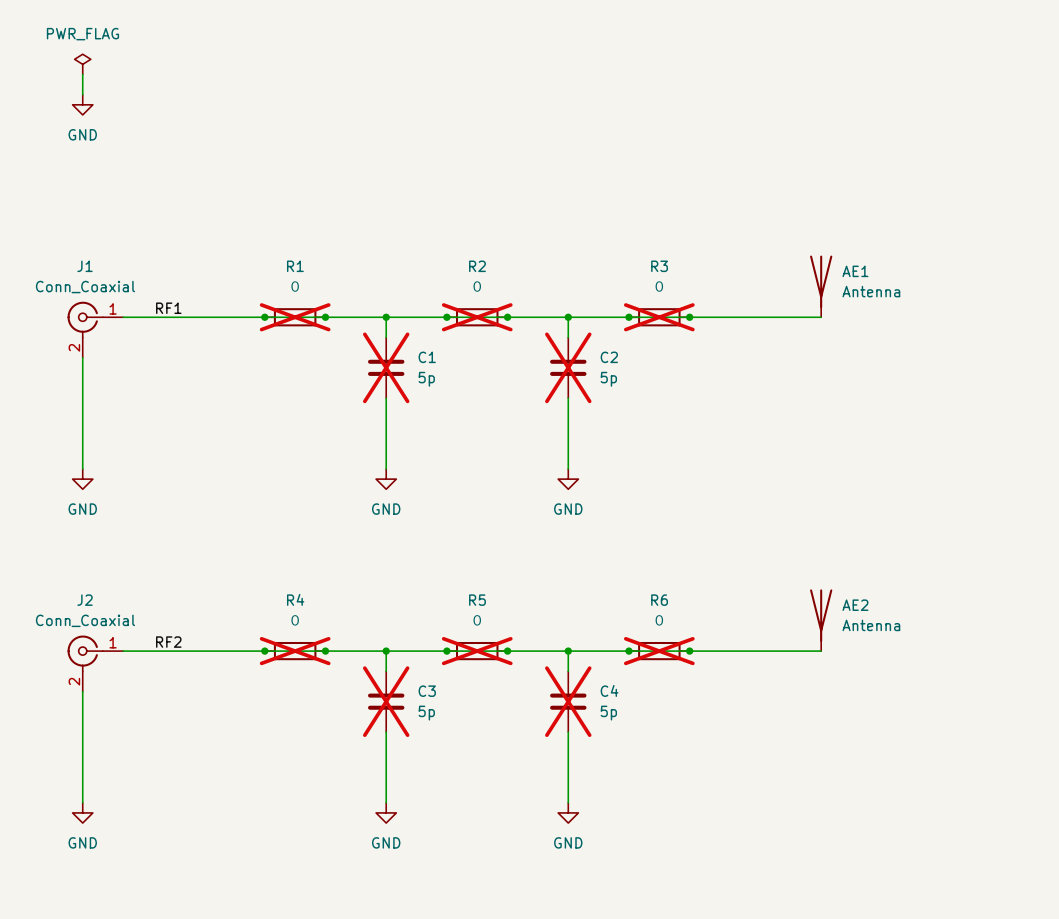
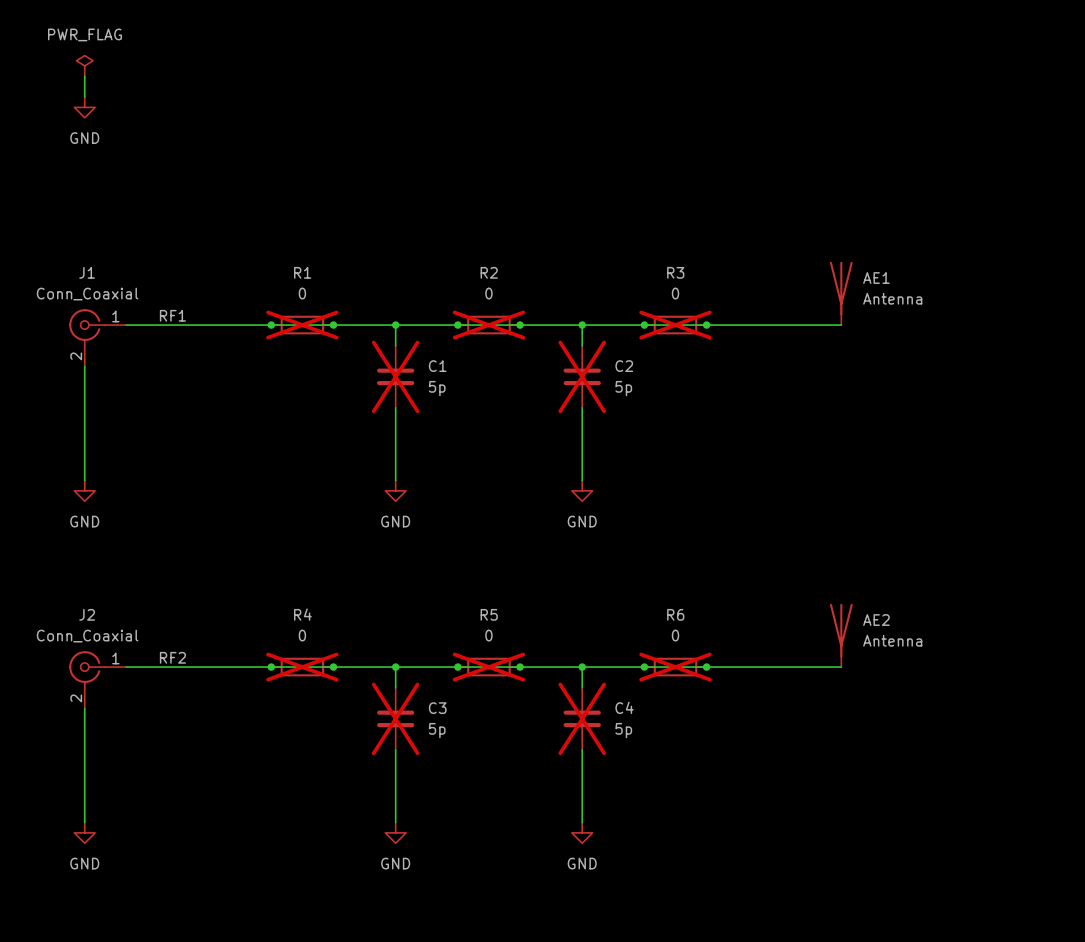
R1 value: ０ (295, 286) -> 0 (302, 293)
R2 value: ０ (477, 286) -> 0 (488, 293)
R3 value: ０ (659, 286) -> 0 (675, 293)
R4 value: ０ (295, 620) -> 0 (302, 635)
R5 value: ０ (477, 620) -> 0 (488, 635)
R6 value: ０ (659, 620) -> 0 (675, 635)

